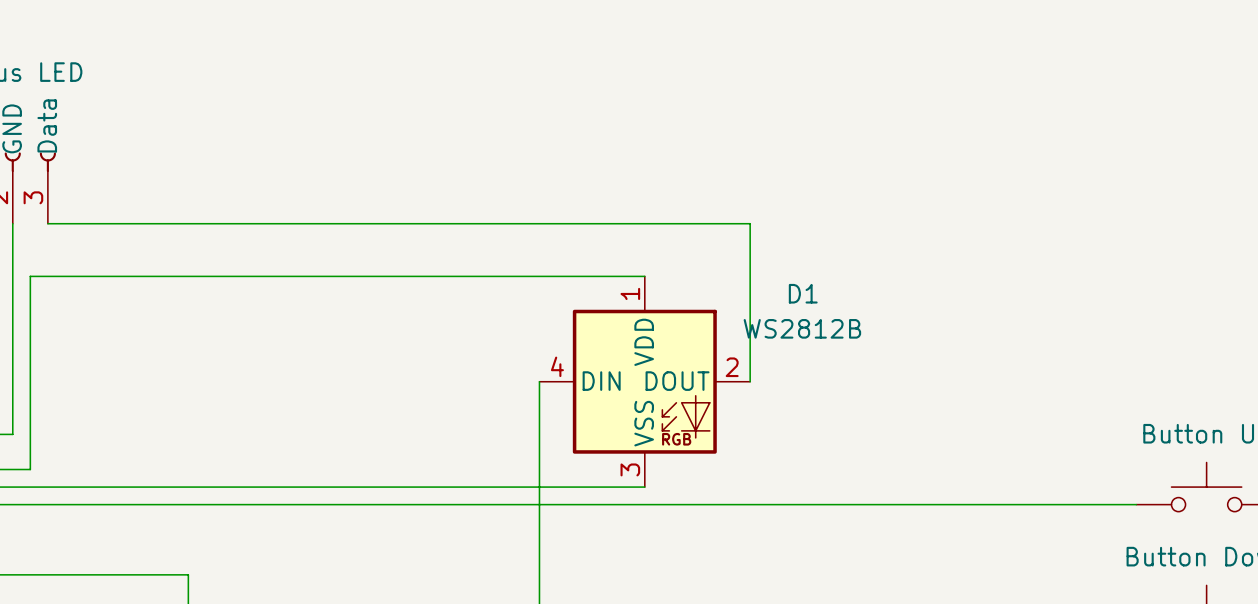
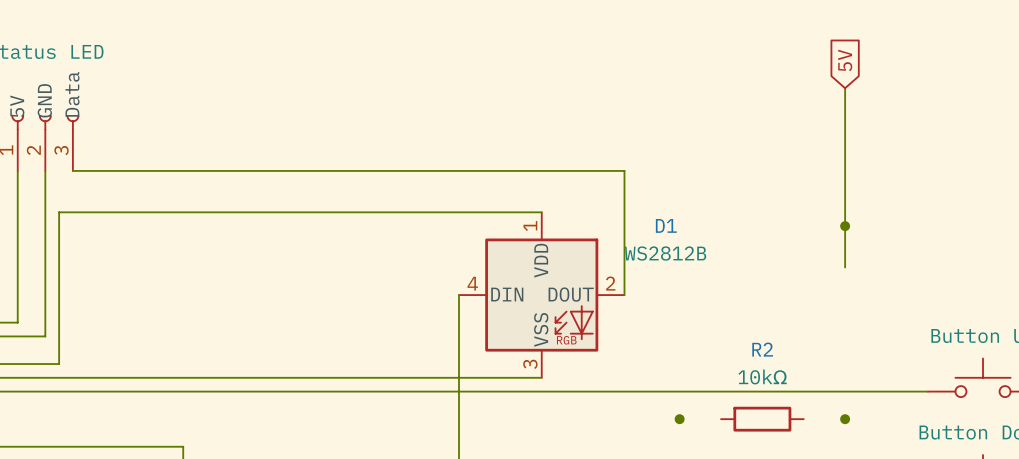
global label: none -> 5V (845, 60)
wire: none -> (845, 88) (845, 267)
junction: none -> (845, 226)
junction: none -> (679, 419)
R2: none -> 10kΩ (762, 419)
junction: none -> (845, 419)

